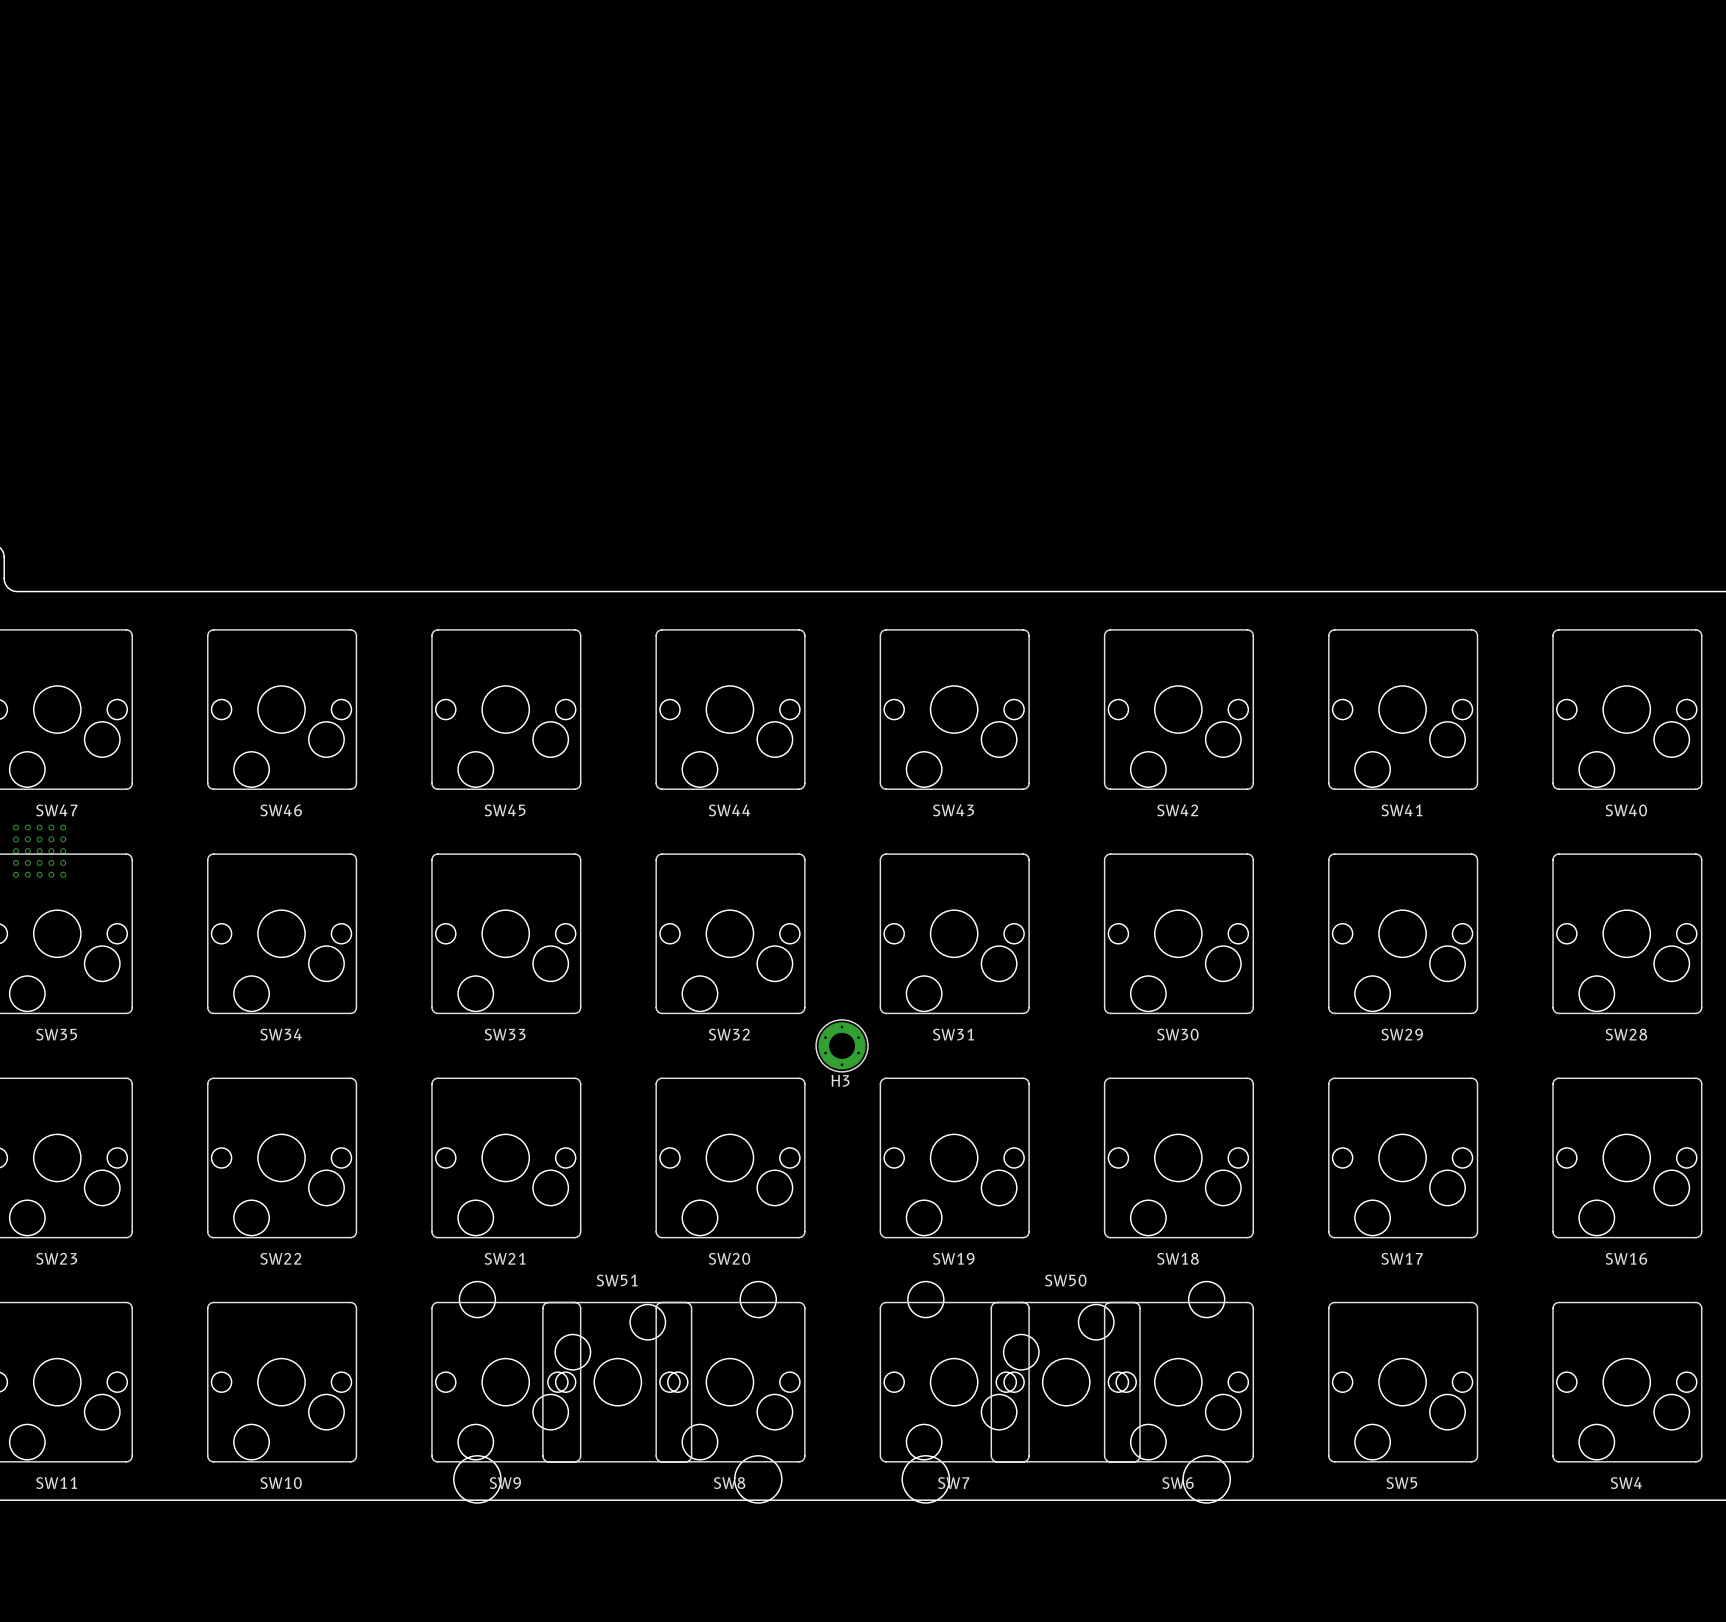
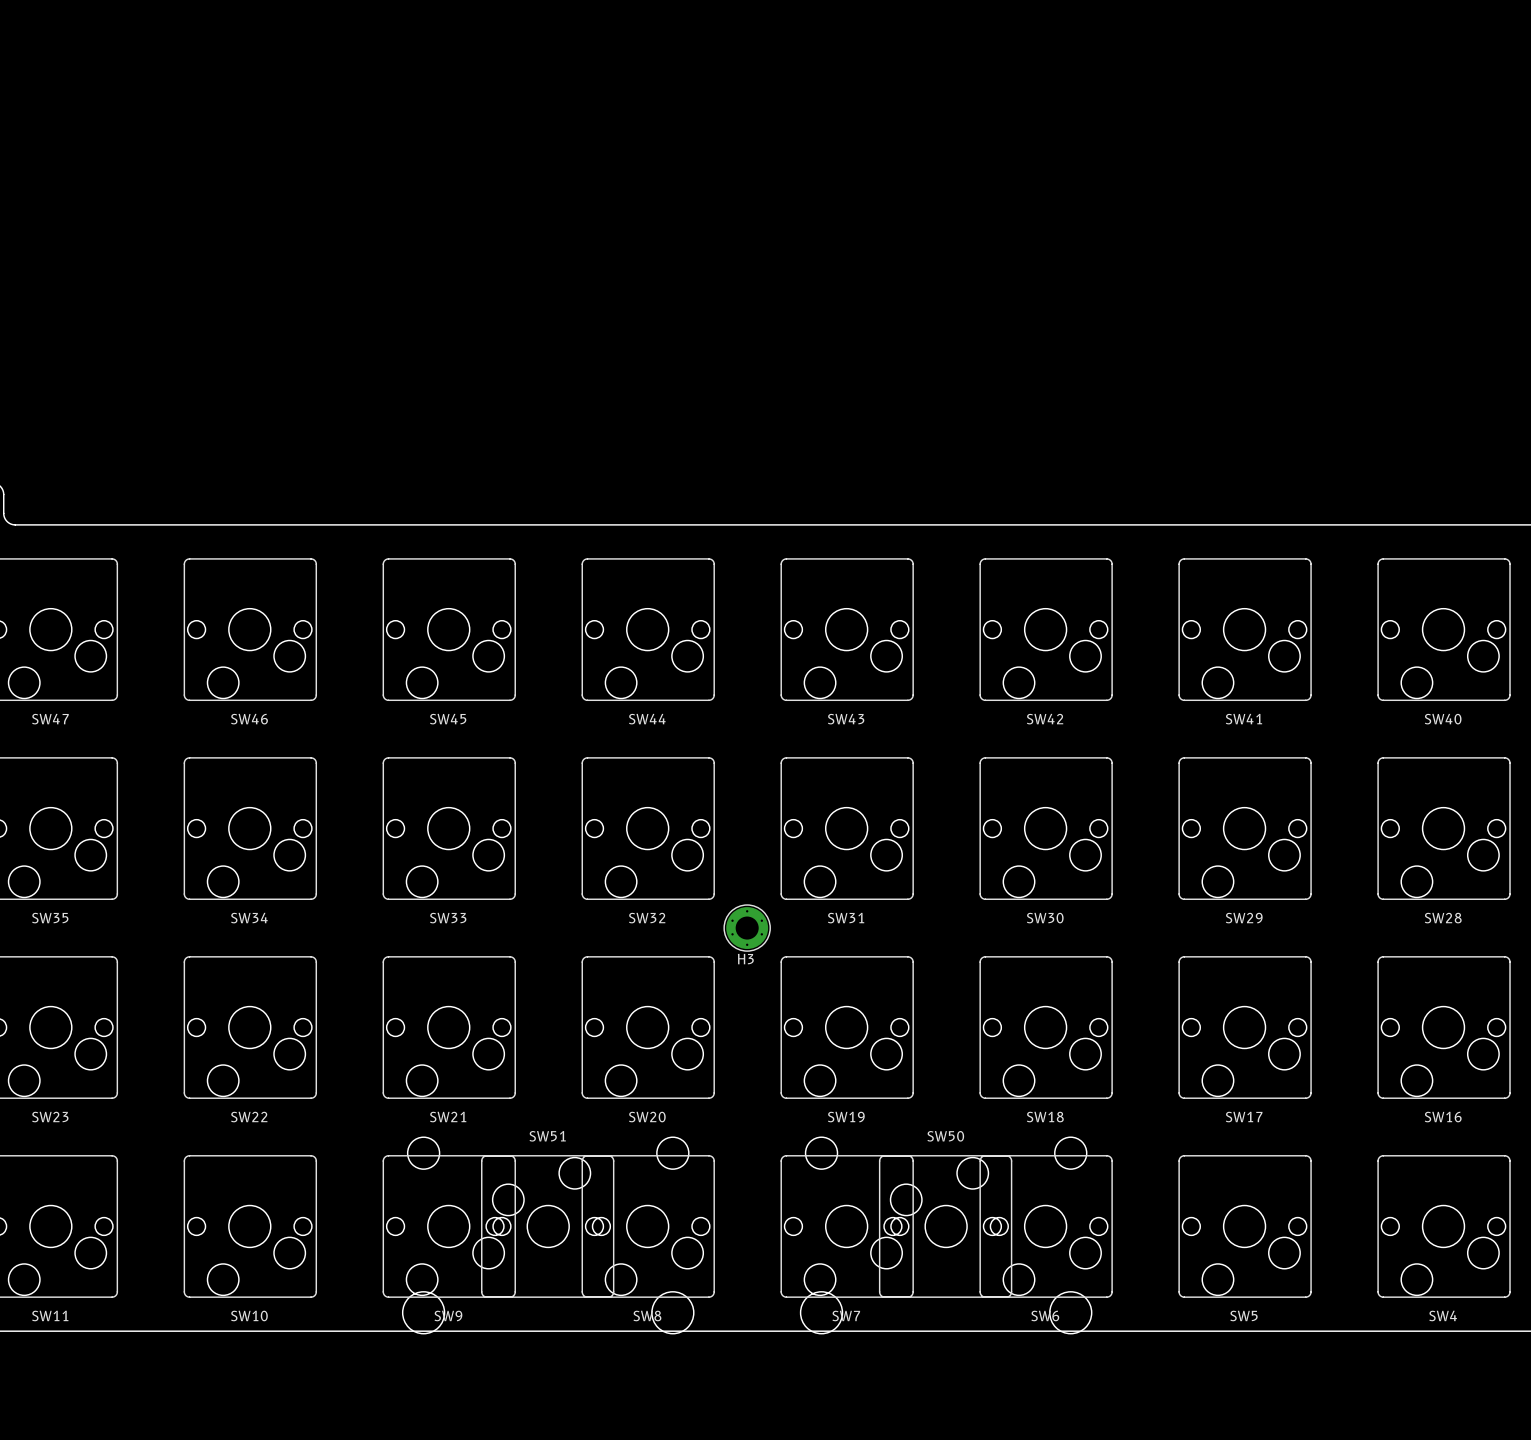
part: (39, 851) -> none

